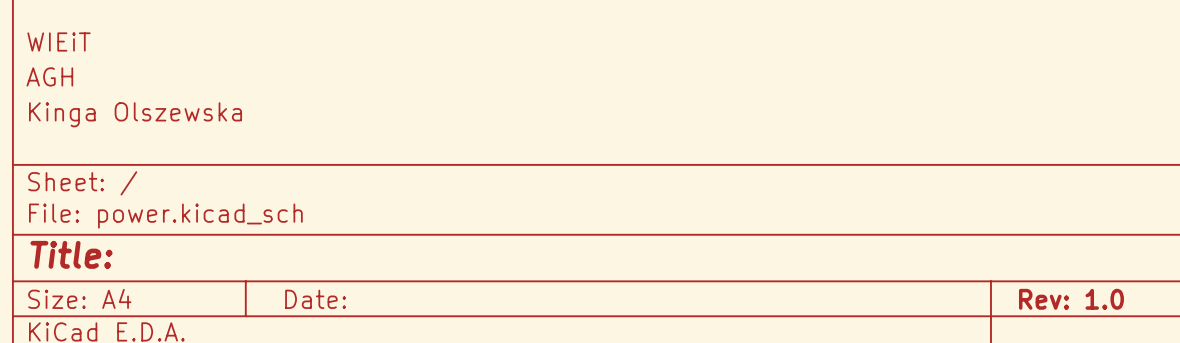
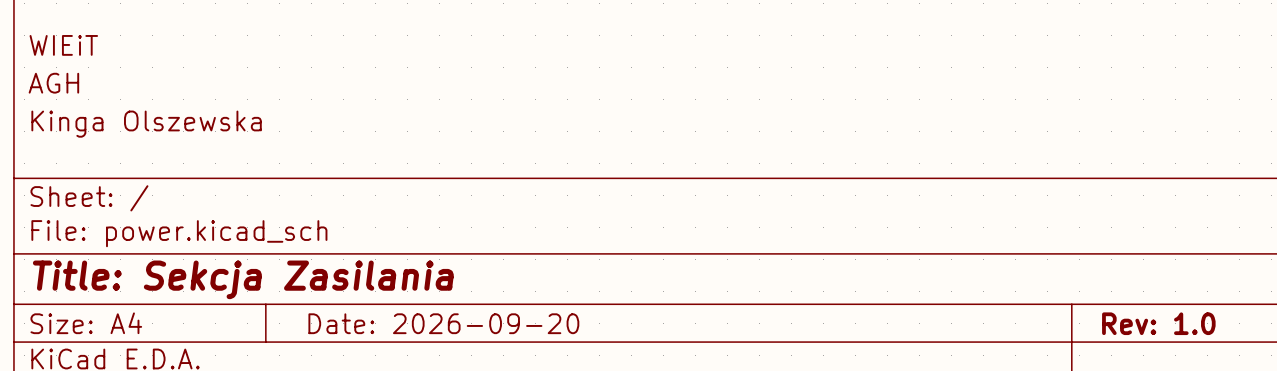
title block: Title: (71, 254) -> Title: Sekcja Zasilania (243, 279)
title block: Date: (315, 299) -> Date: 2026-09-20 (443, 323)

